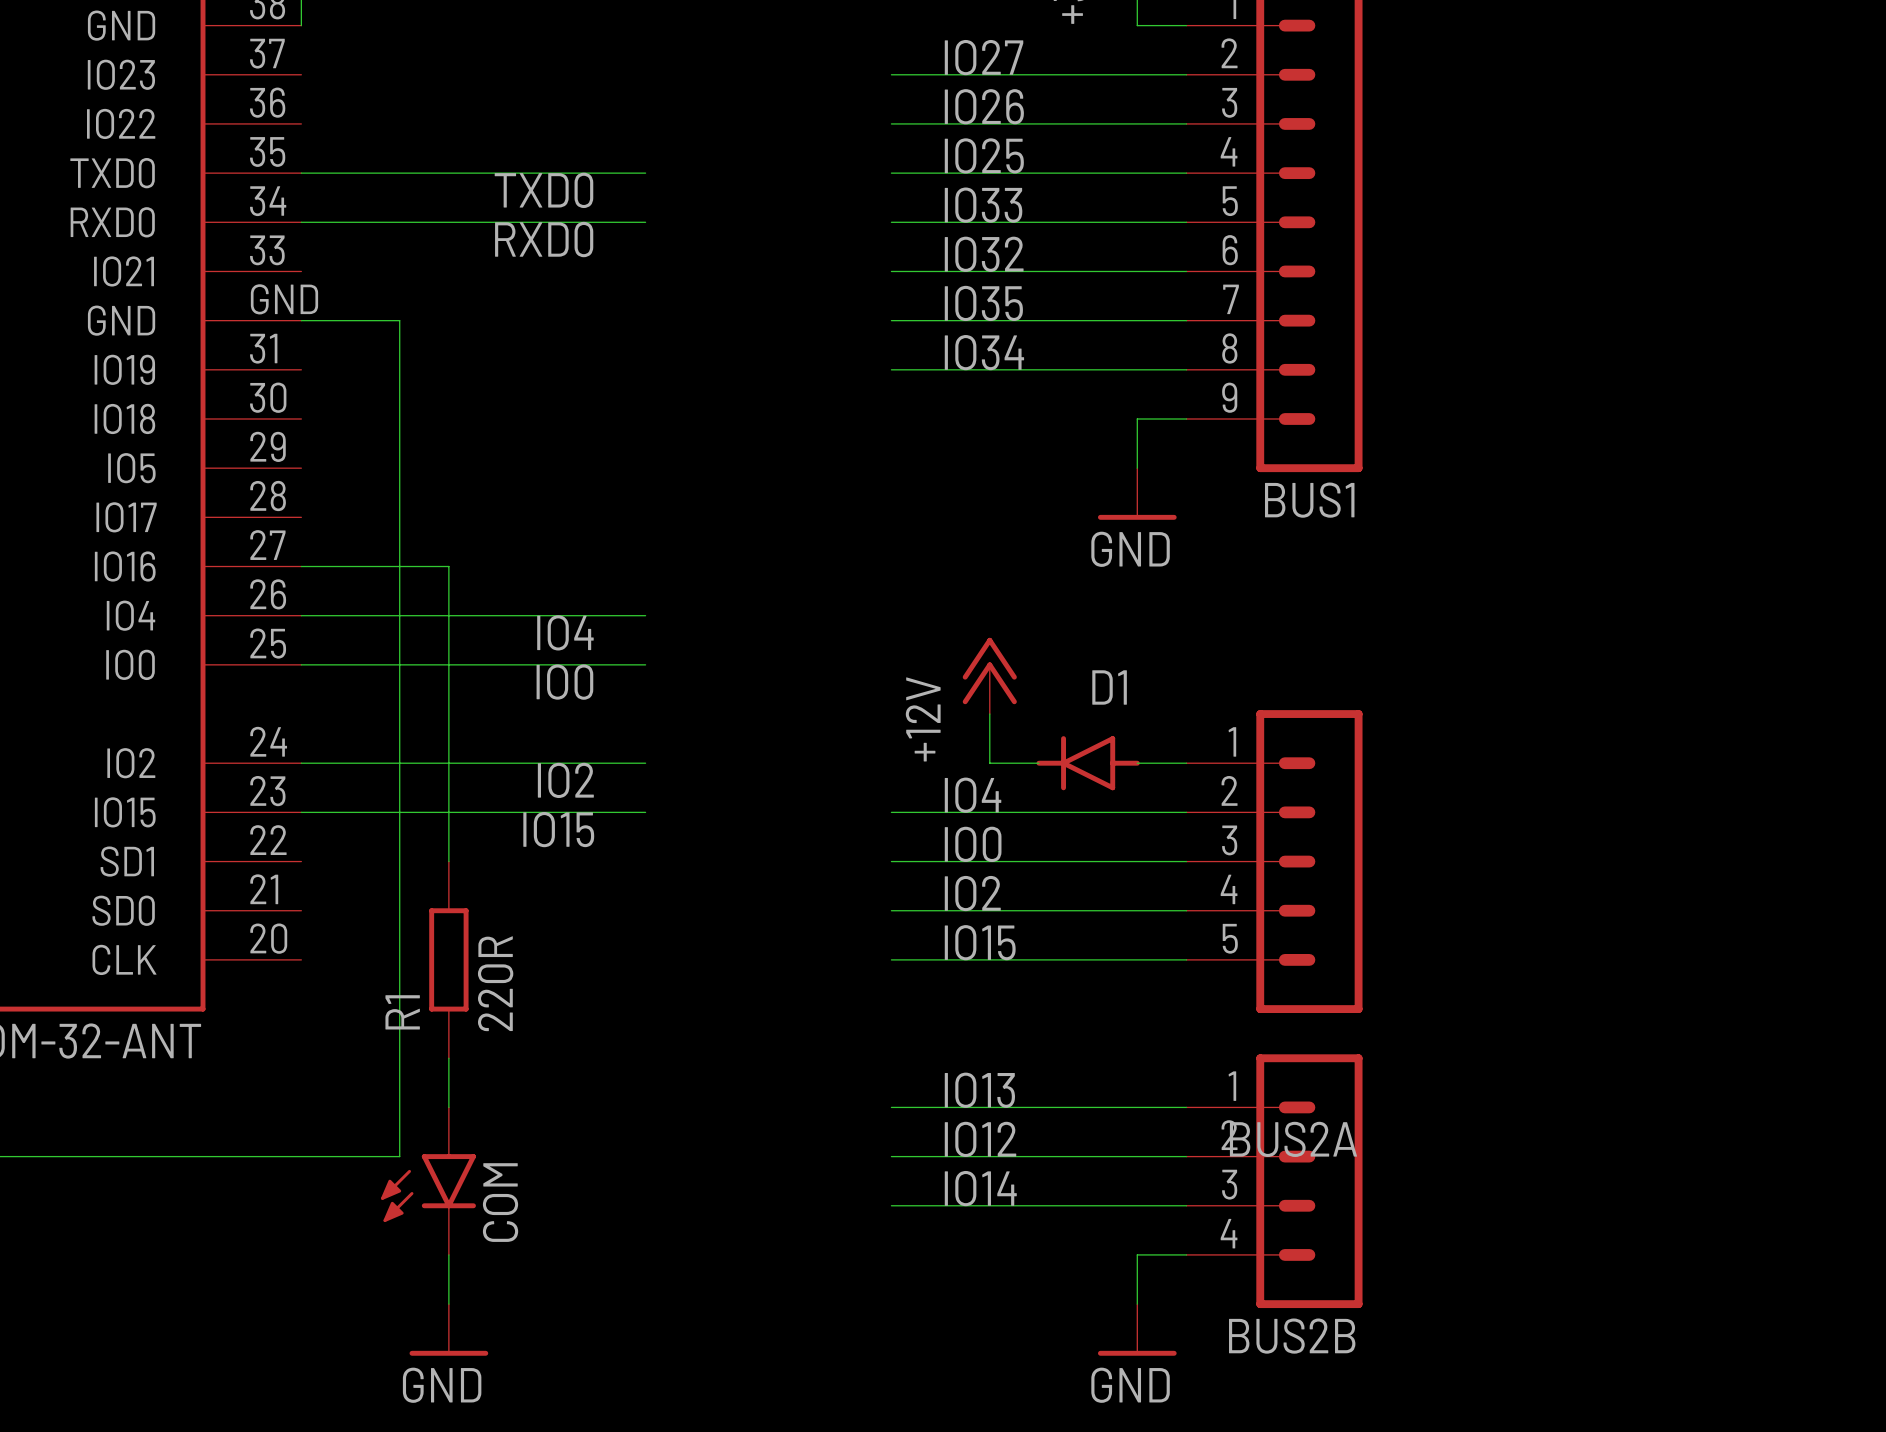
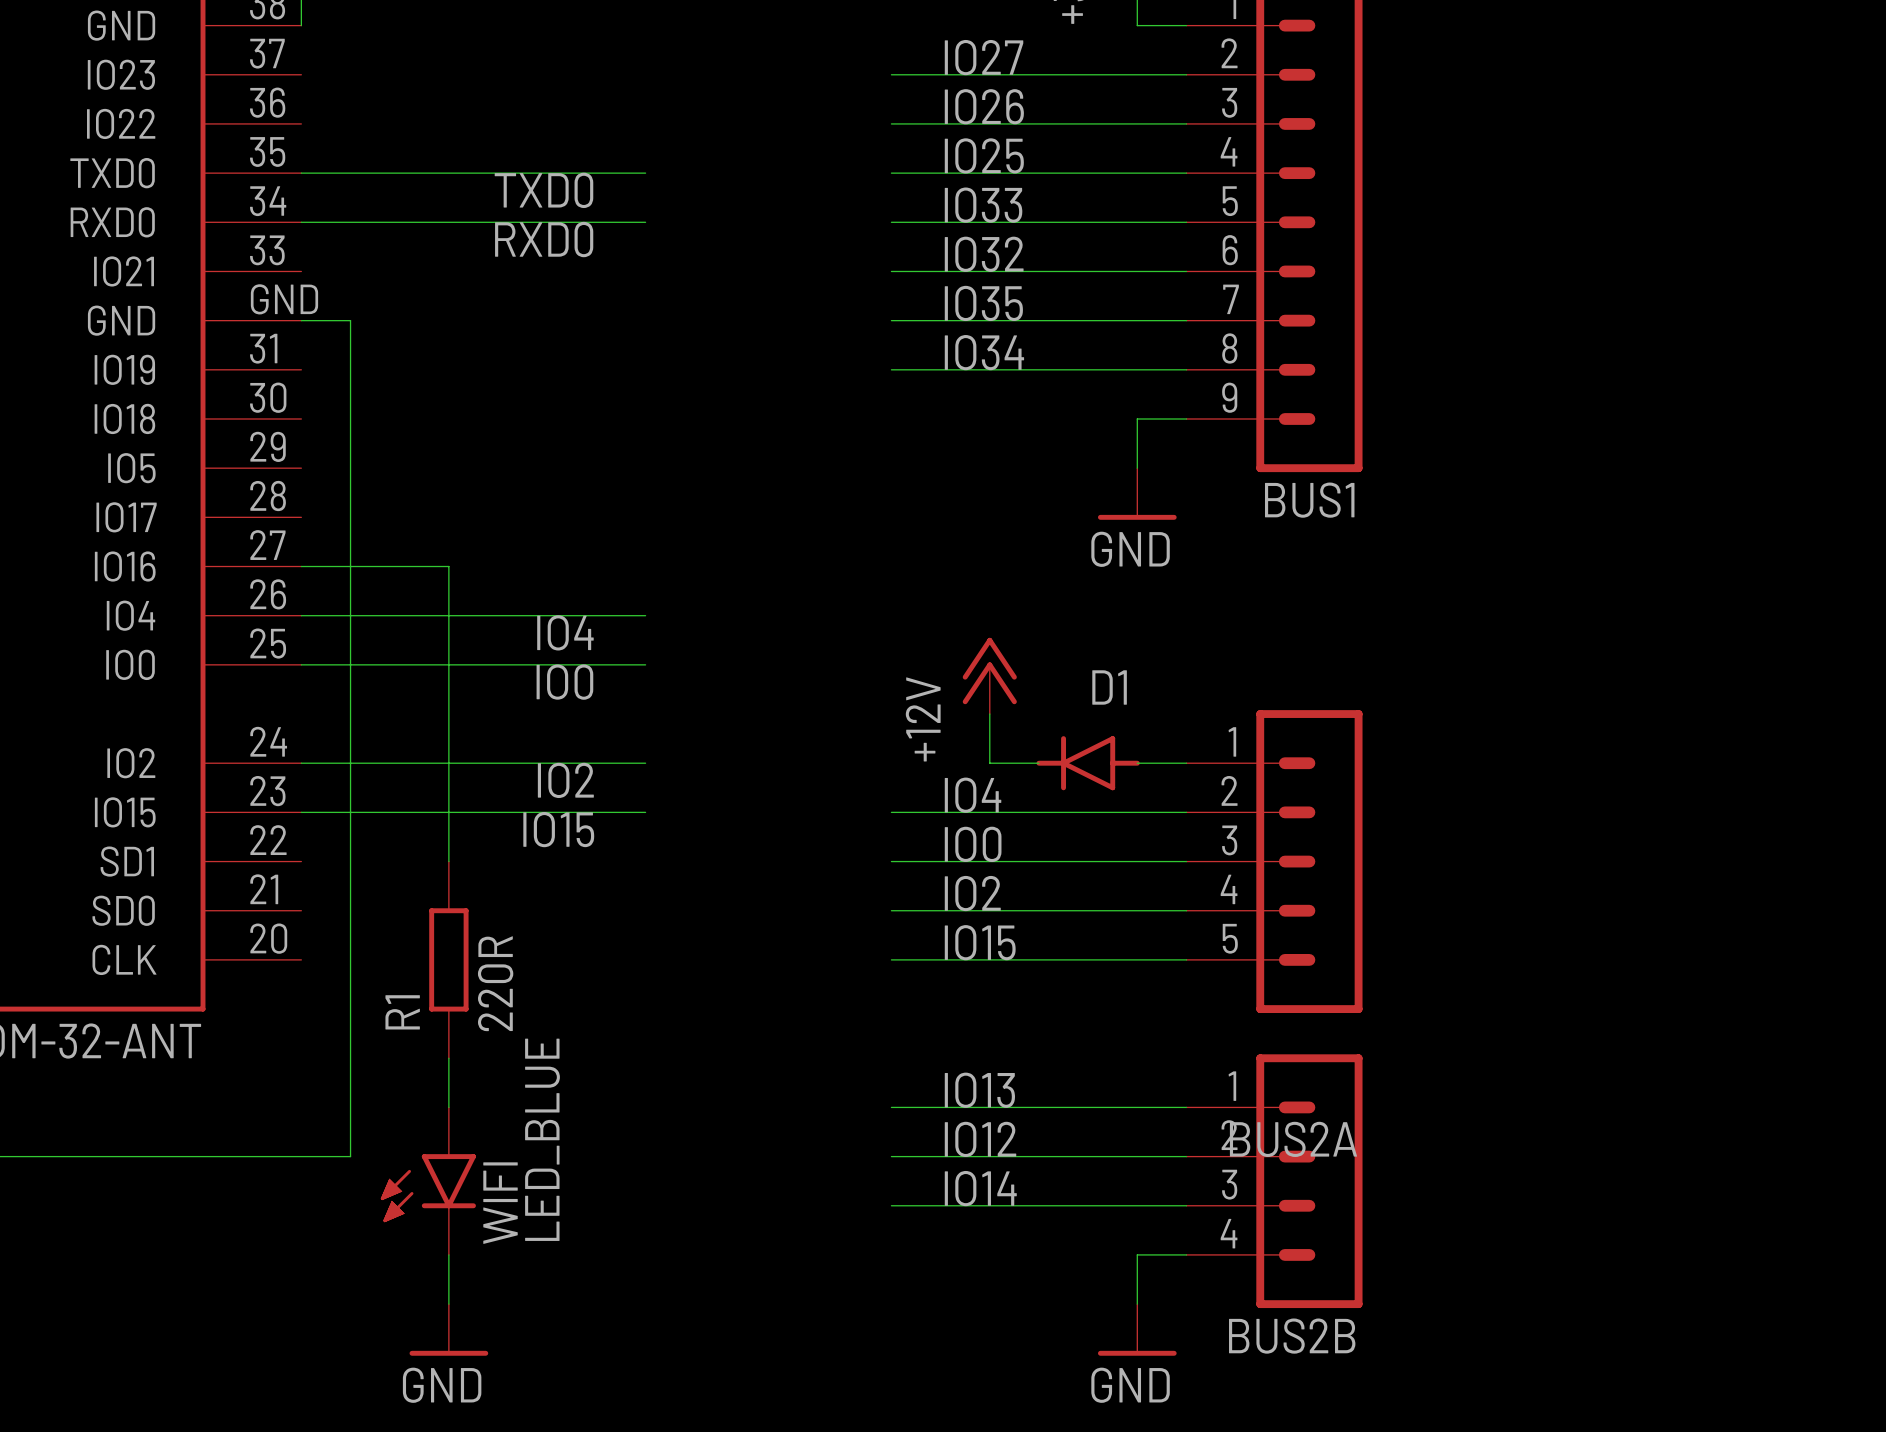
wire: (350, 320) (399, 320) (399, 1156) (350, 1156) -> (350, 320) (350, 1156)
COM: (428, 1181) -> none
WIFI: none -> LED_BLUE (428, 1181)

